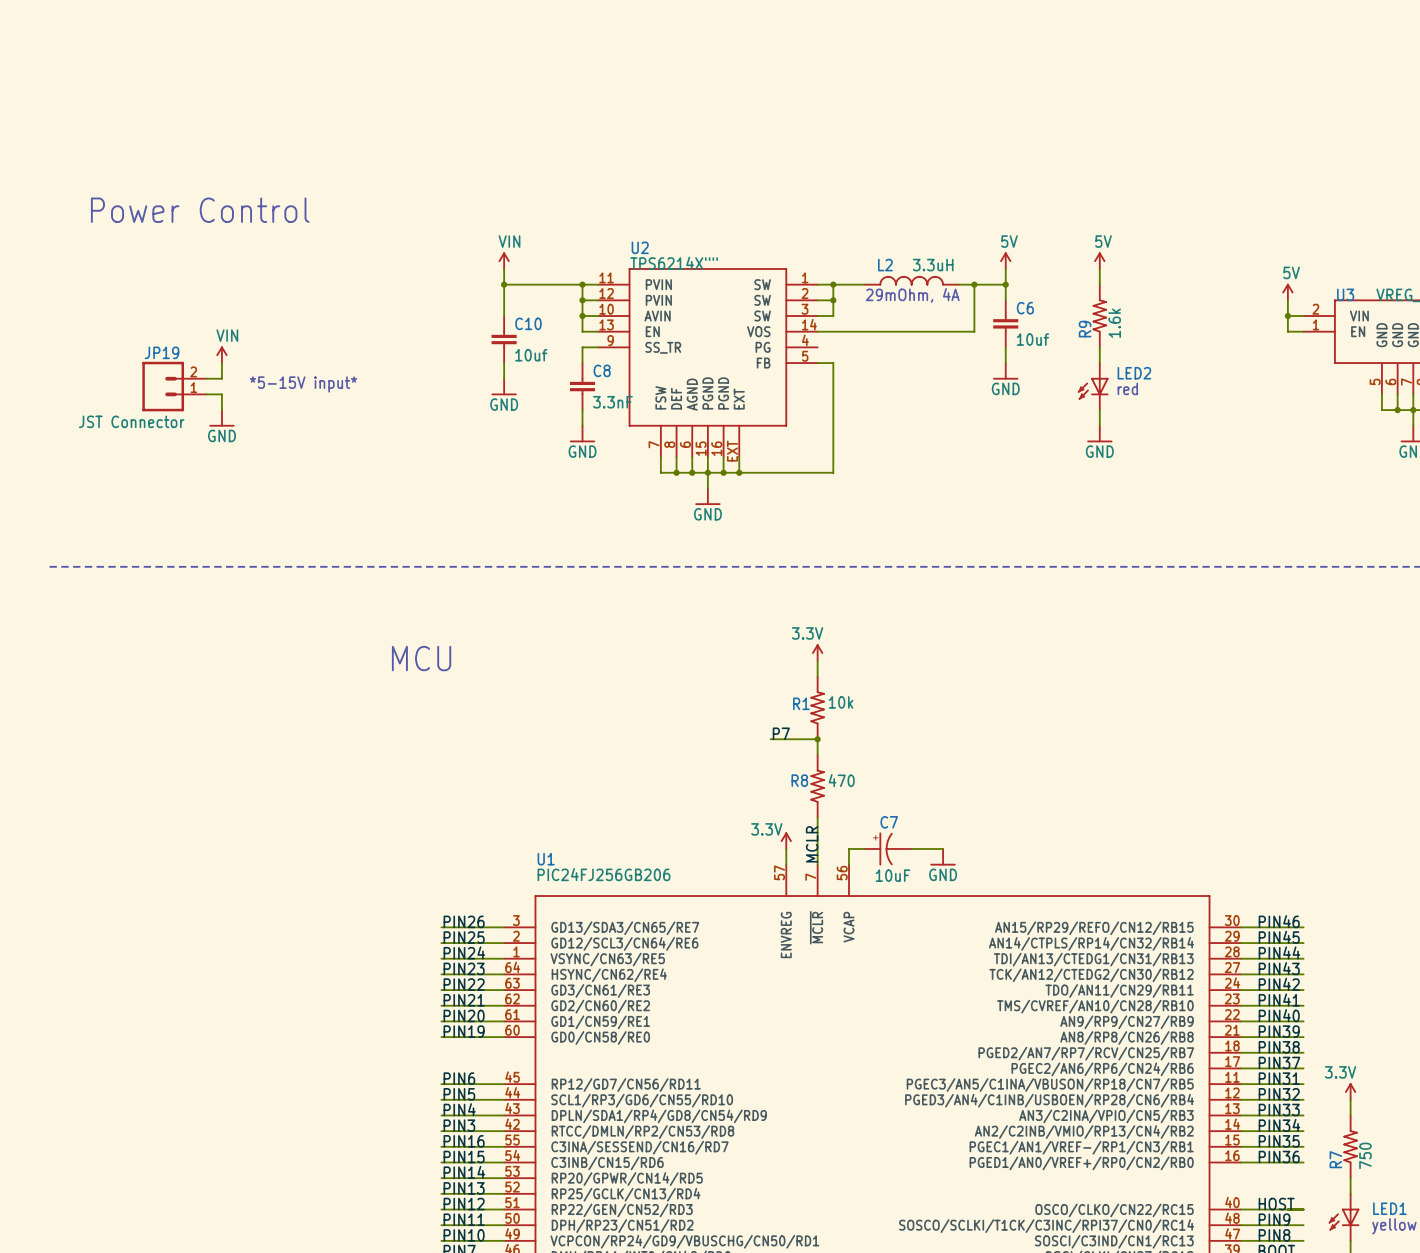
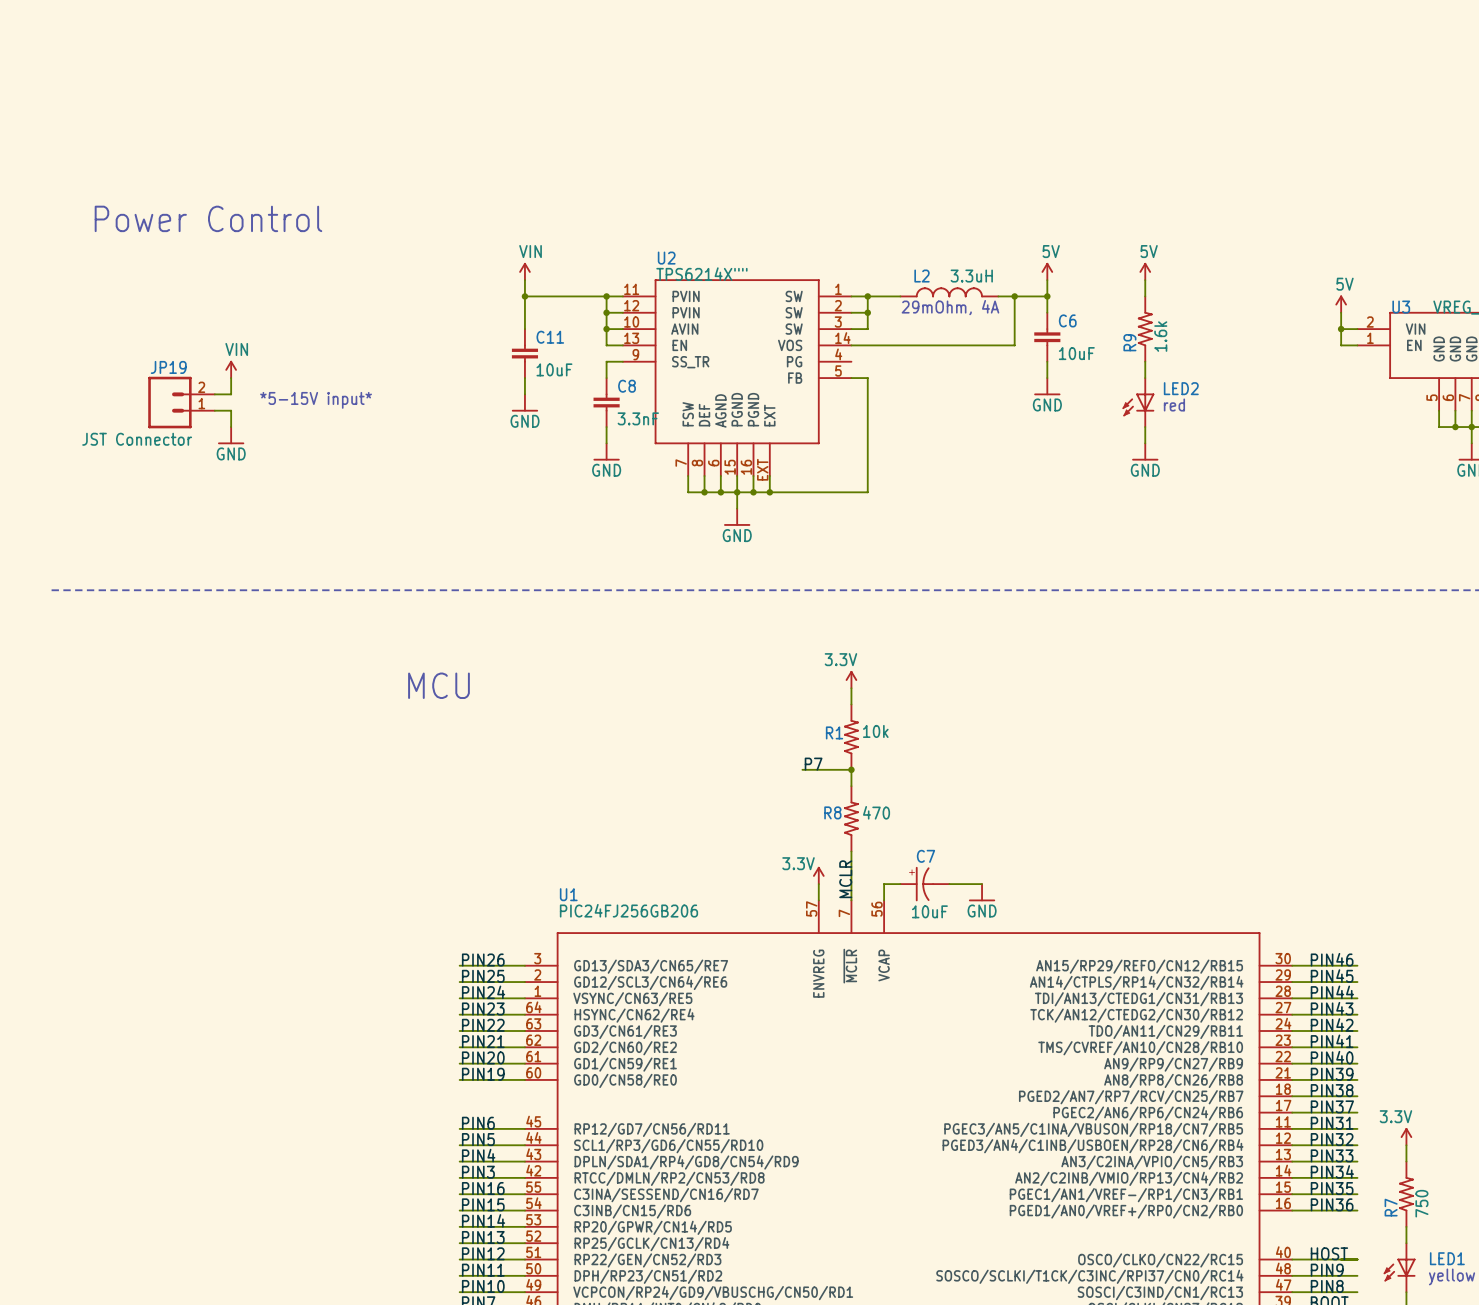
C10 name: C10 (528, 323) -> C11 (550, 337)
C6 value: 10uf (1032, 339) -> 10uF (1076, 353)
C10 value: 10uf (531, 355) -> 10uF (554, 369)

